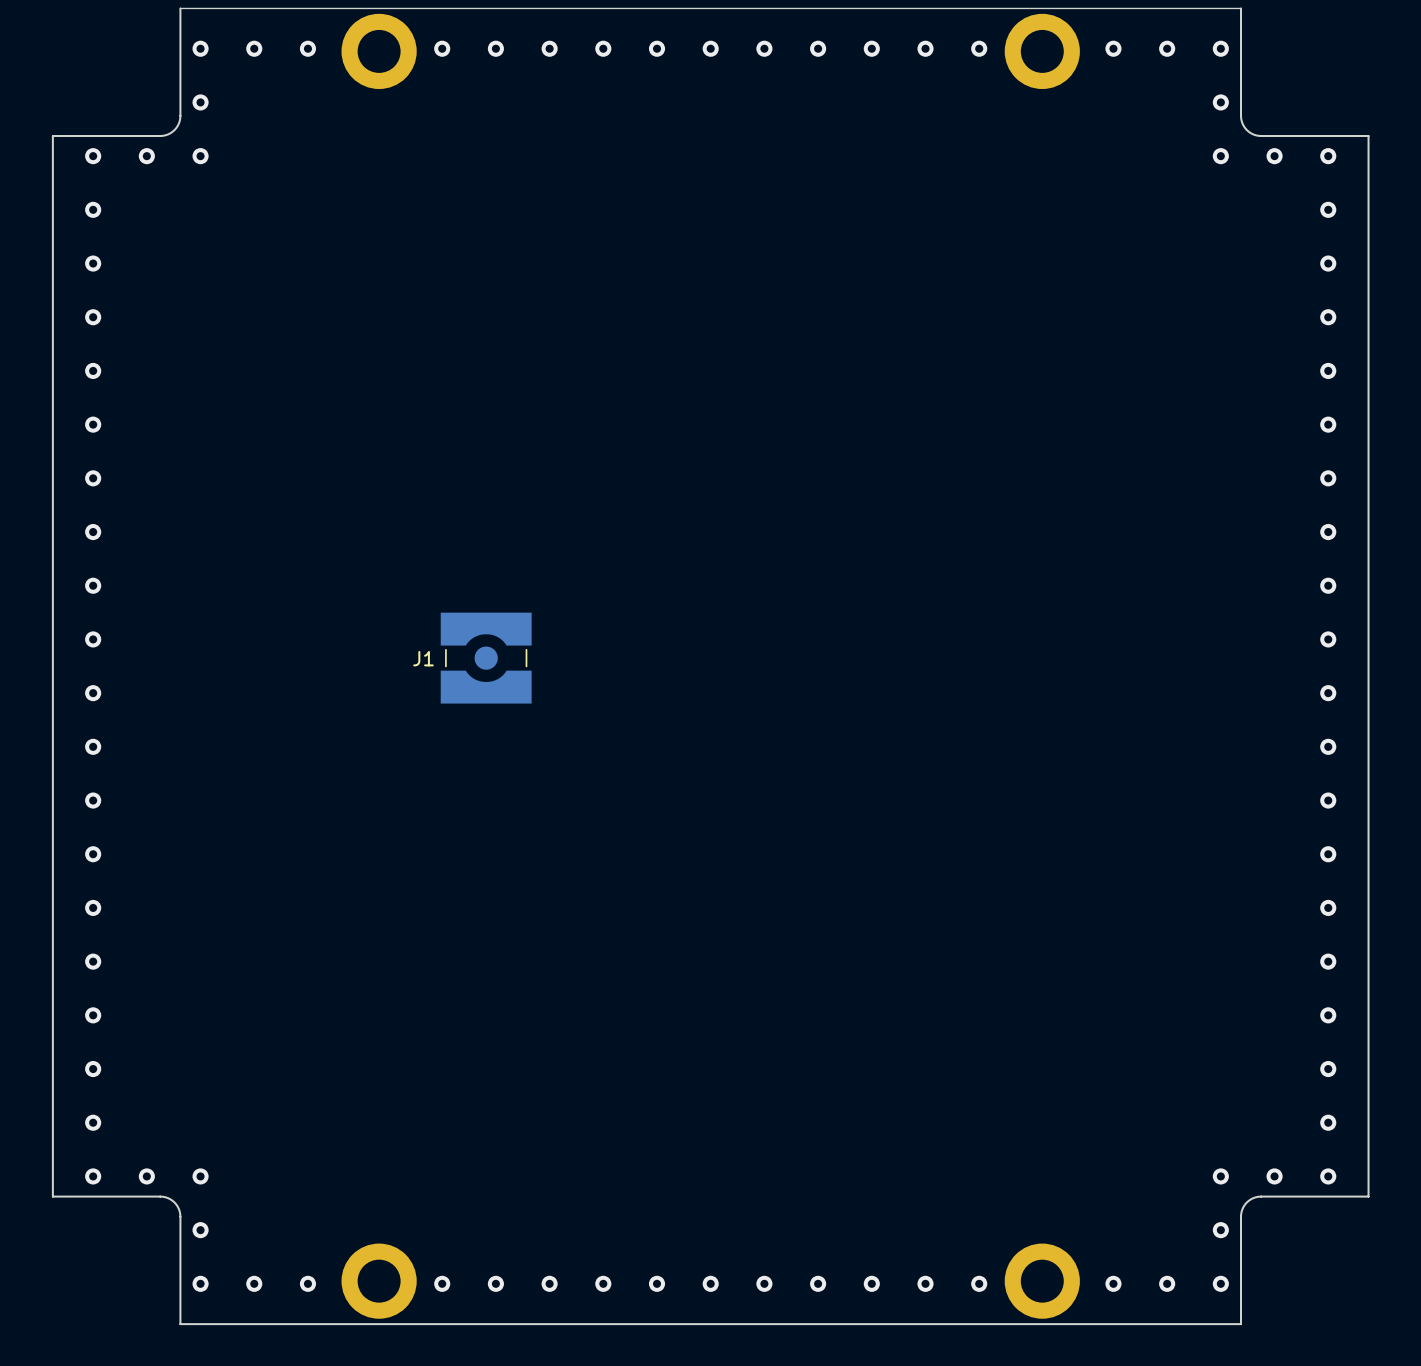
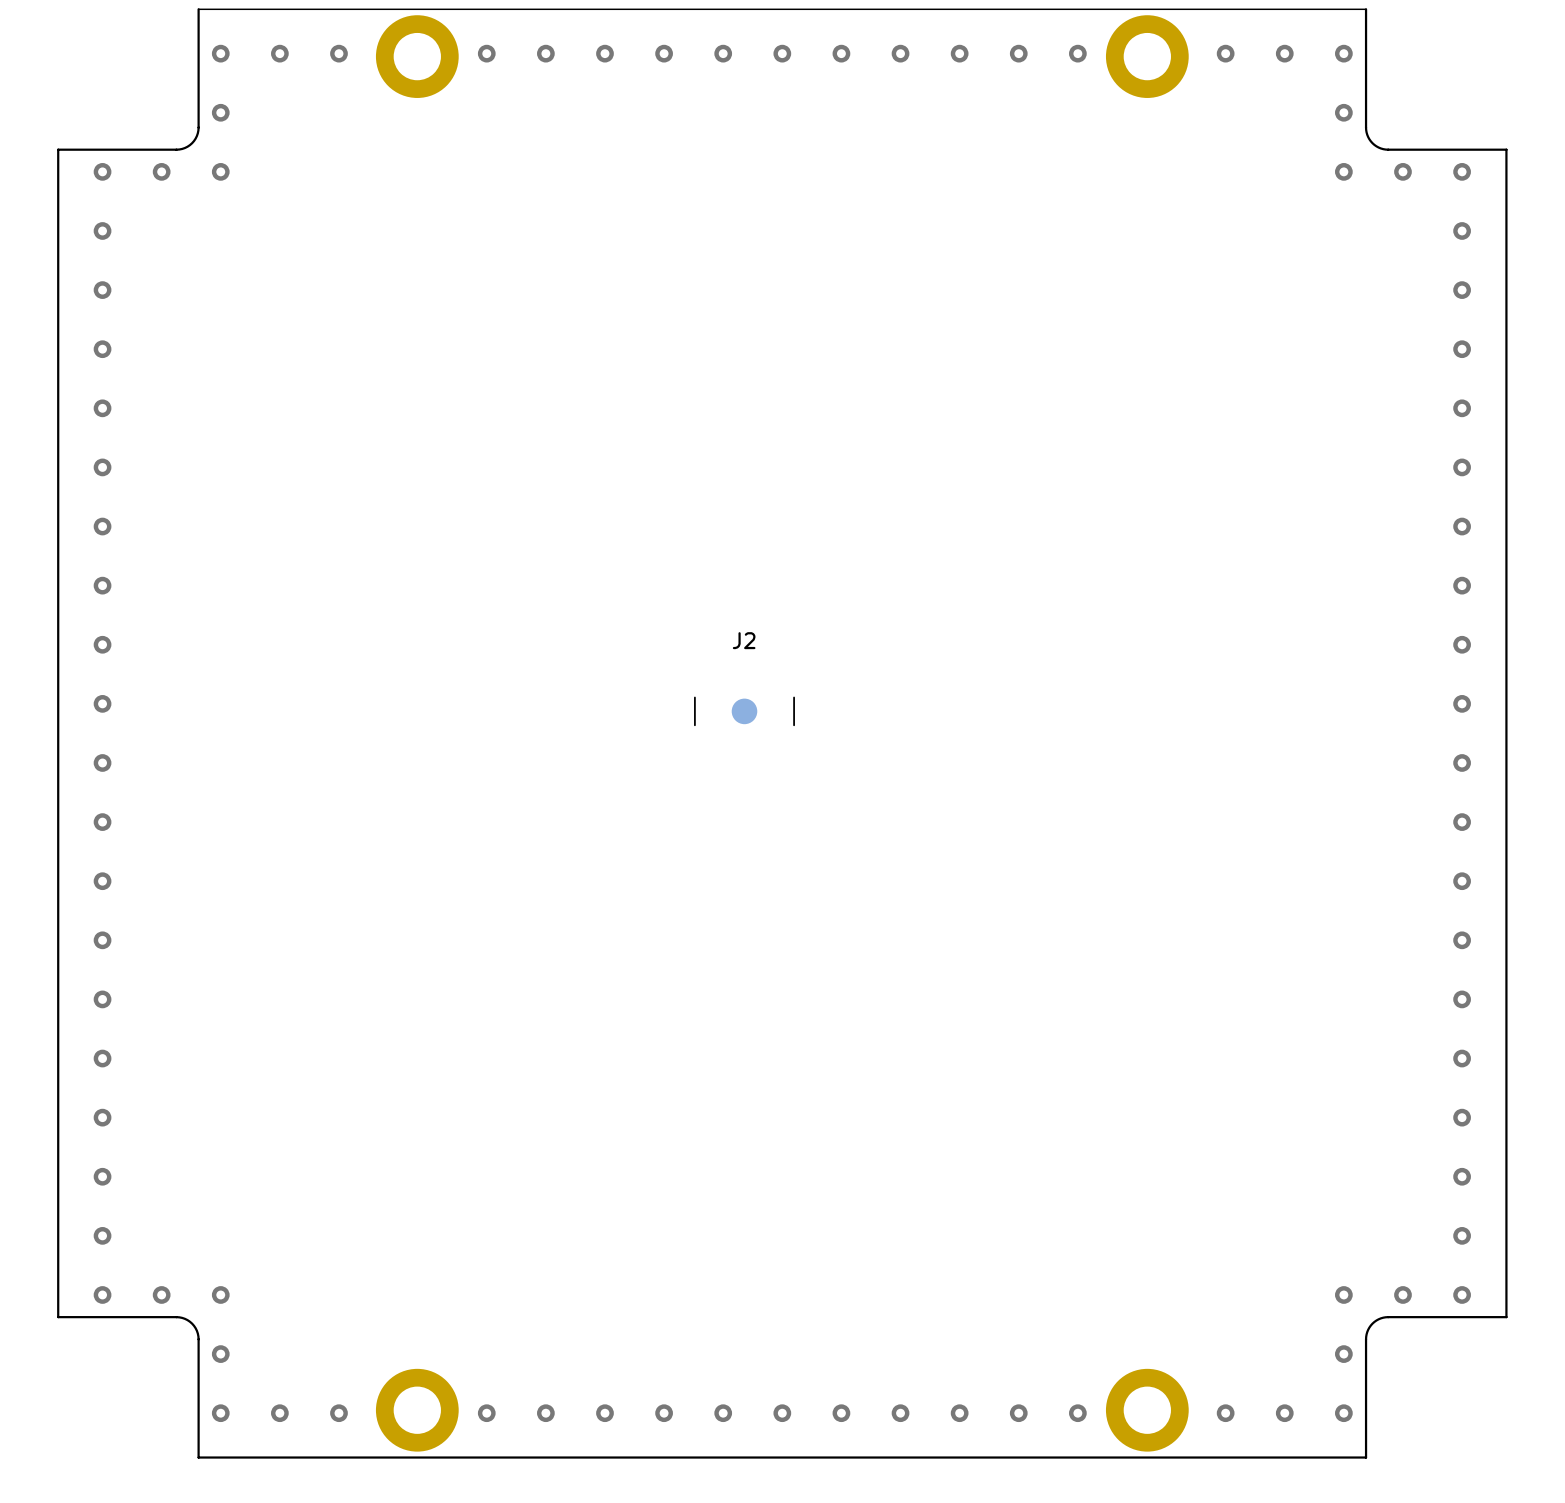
J2: none -> (744, 711)
J1: (486, 658) -> none

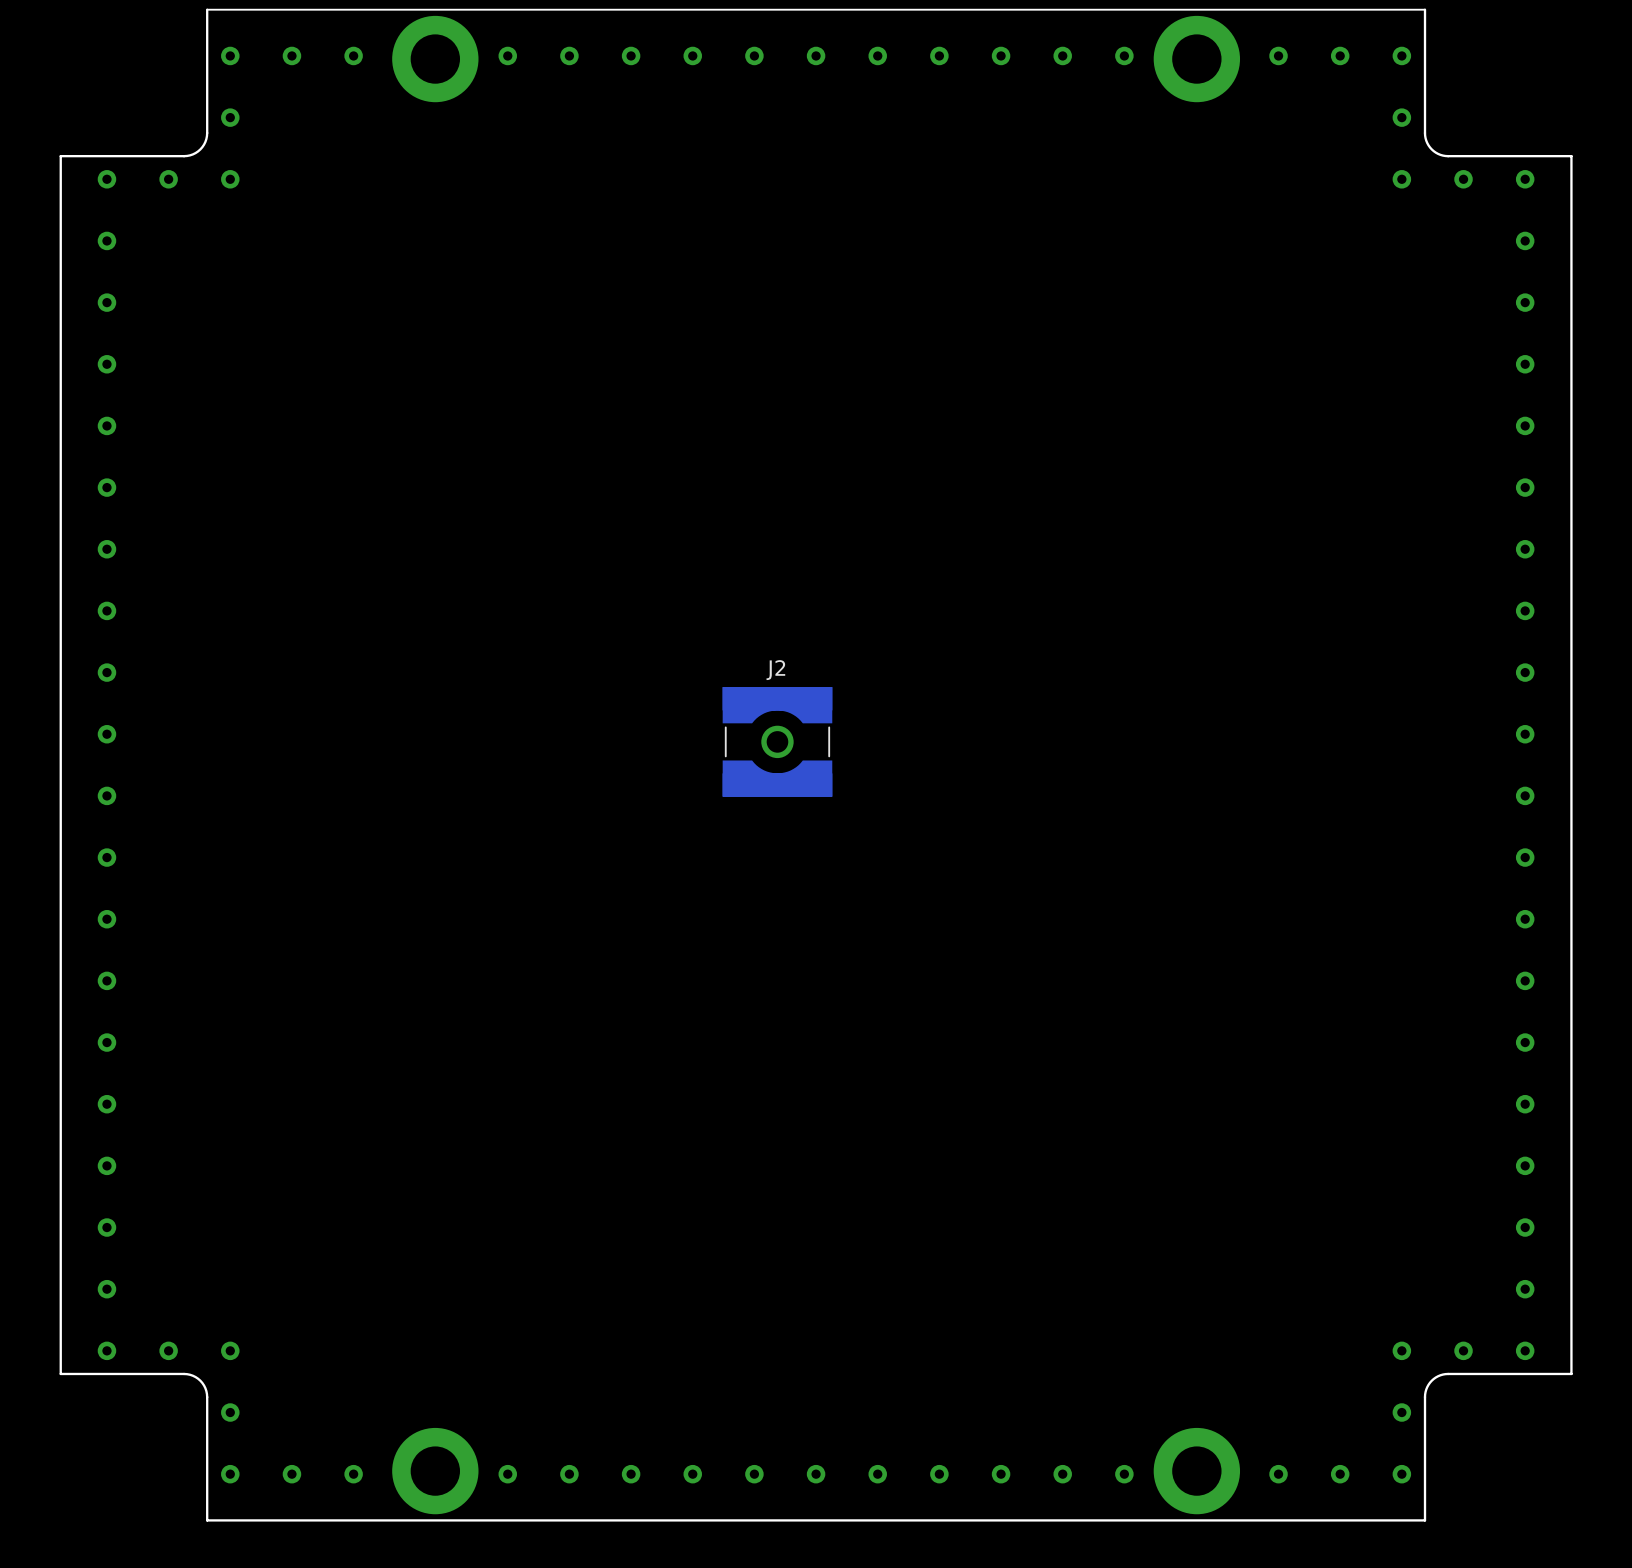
J2 footprint: [694, 696, 795, 727] -> [722, 687, 833, 797]
via: none -> (777, 741)

